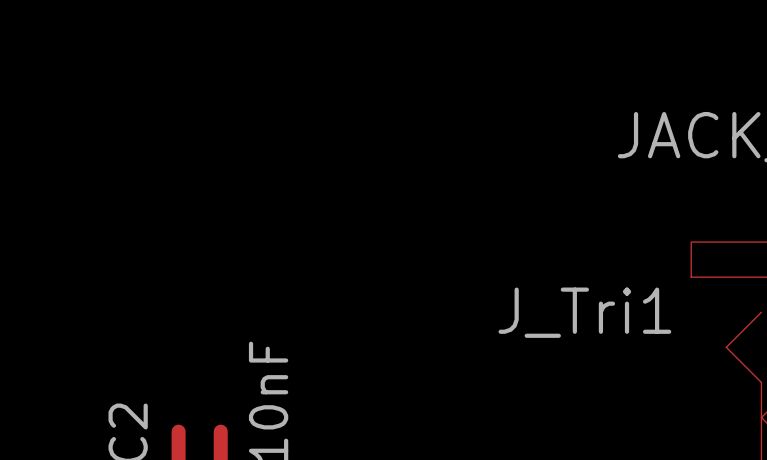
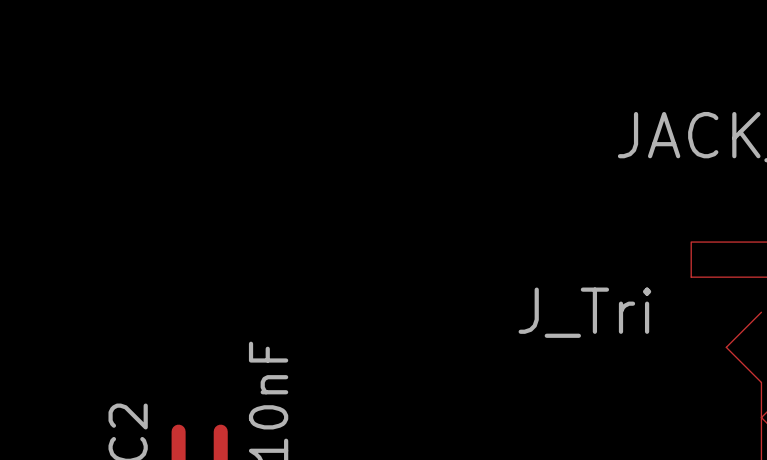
J_Tri1 name: J_Tri1 (584, 312) -> J_Tri (584, 312)

